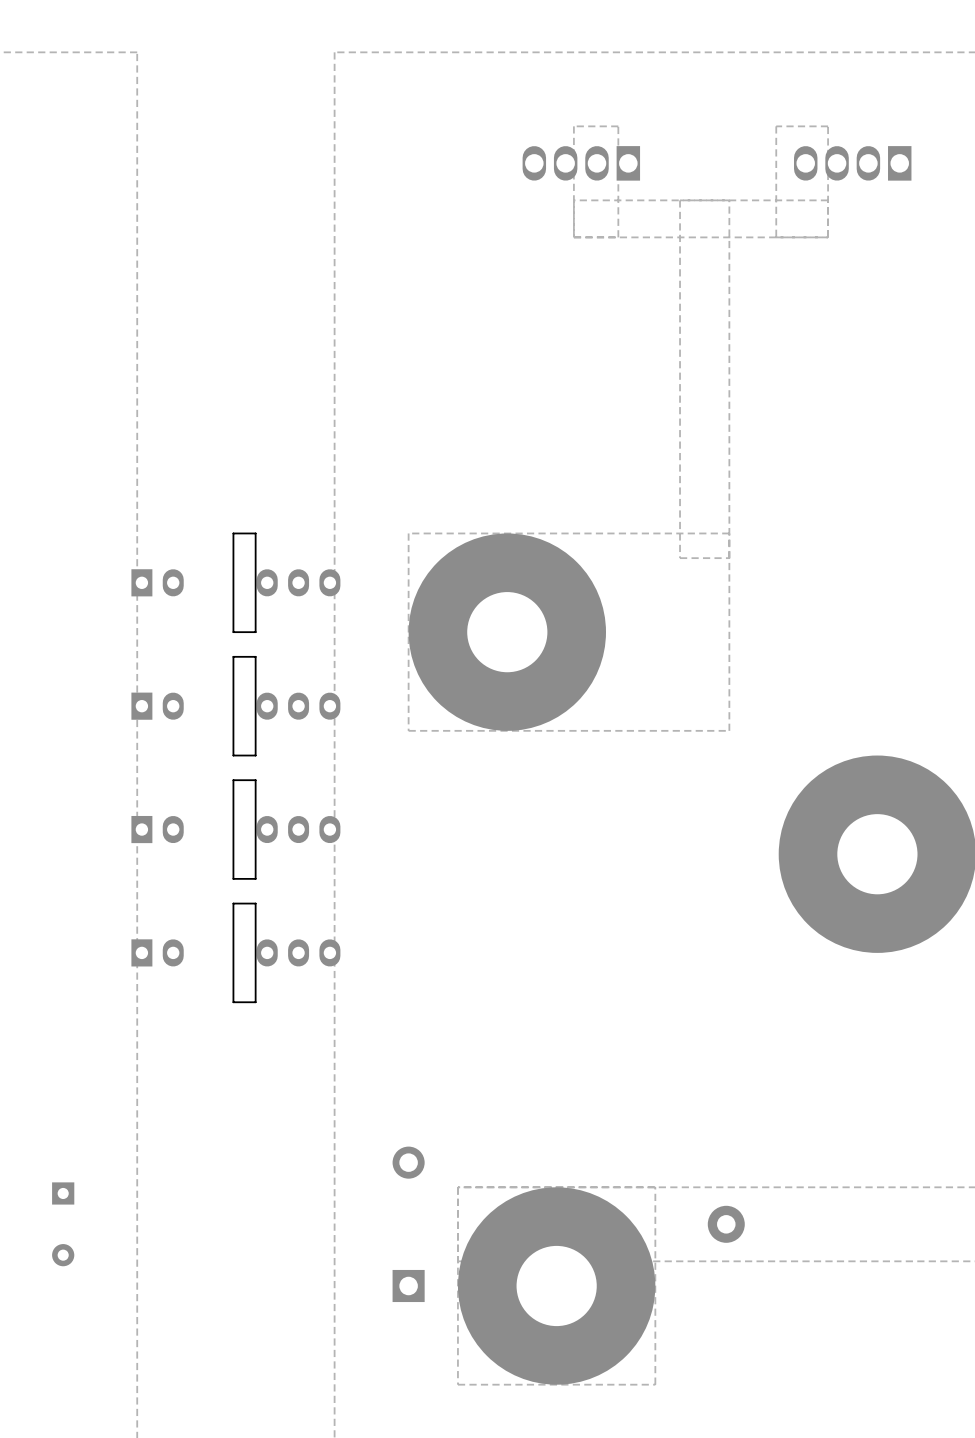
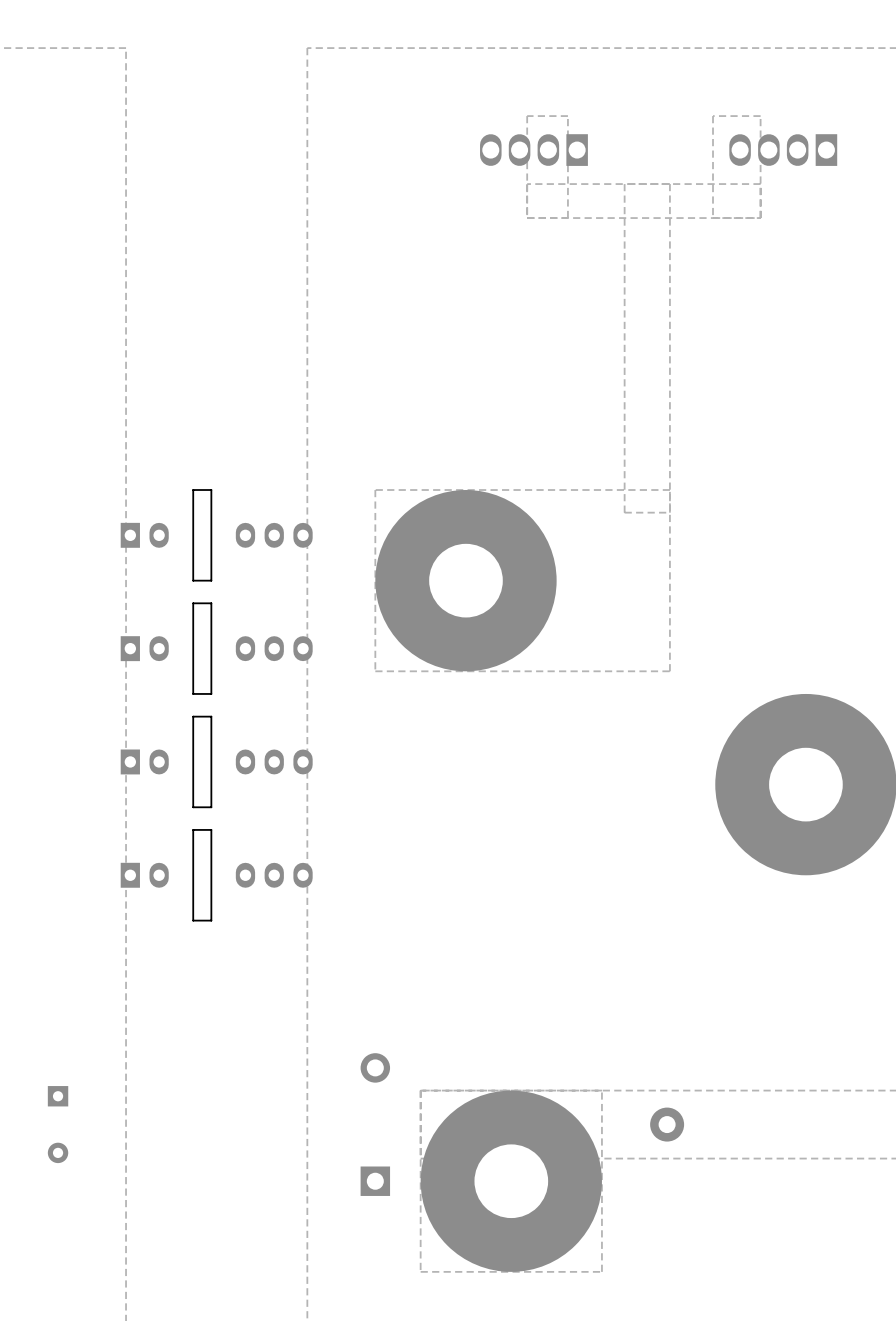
board edge: none -> (211, 490) (211, 580) (193, 580) (193, 490) (211, 490)
board edge: (255, 533) (255, 632) (233, 632) (233, 533) (255, 533) -> none
board edge: none -> (211, 603) (211, 693) (193, 693) (193, 603) (211, 603)
board edge: (255, 656) (255, 755) (233, 755) (233, 656) (255, 656) -> none
board edge: none -> (211, 716) (211, 807) (193, 807) (193, 716) (211, 716)
board edge: (255, 780) (233, 780) (233, 878) (255, 878) (255, 780) -> none
board edge: none -> (211, 829) (193, 829) (193, 920) (211, 920) (211, 829)
board edge: (255, 903) (255, 1002) (233, 1002) (233, 903) (255, 903) -> none

